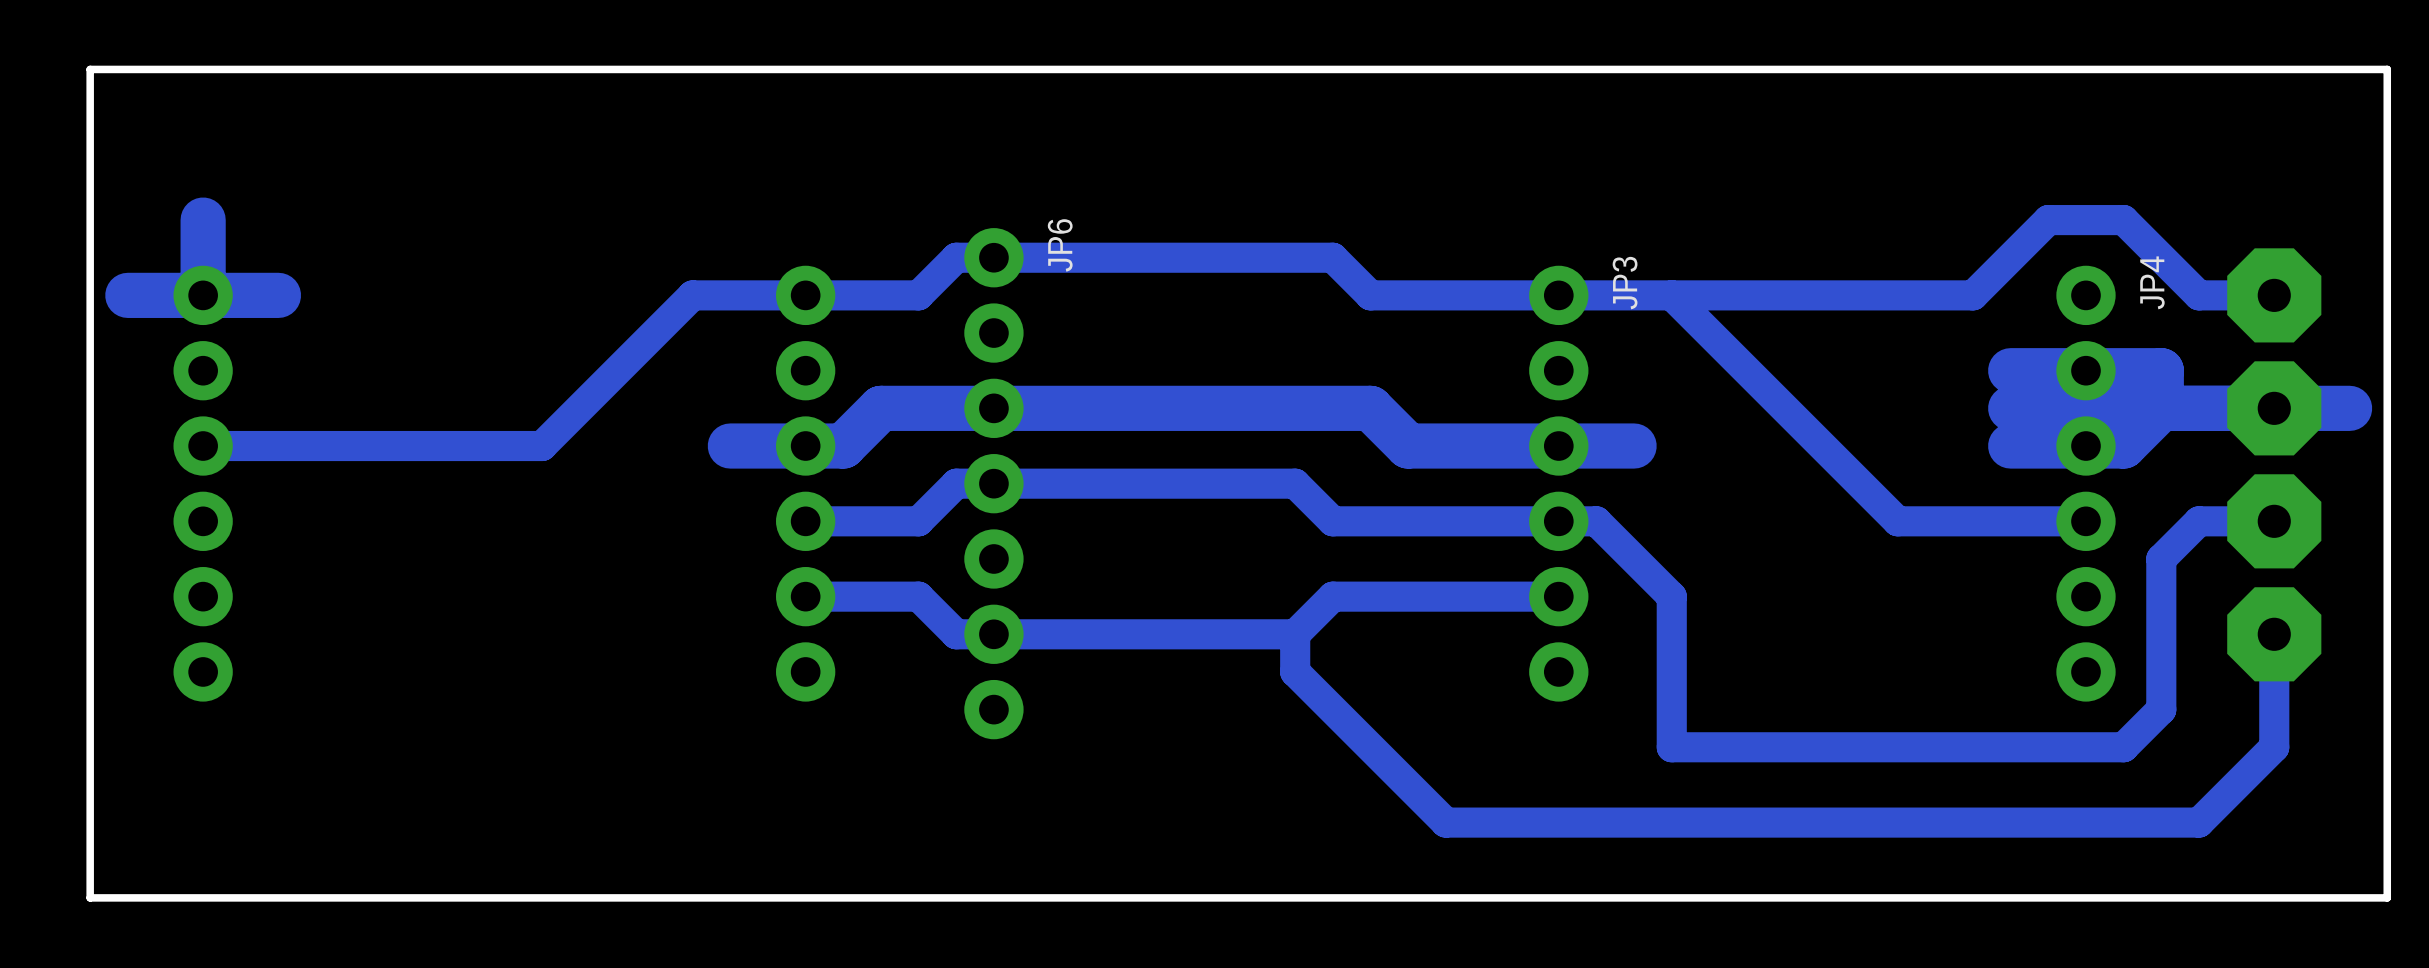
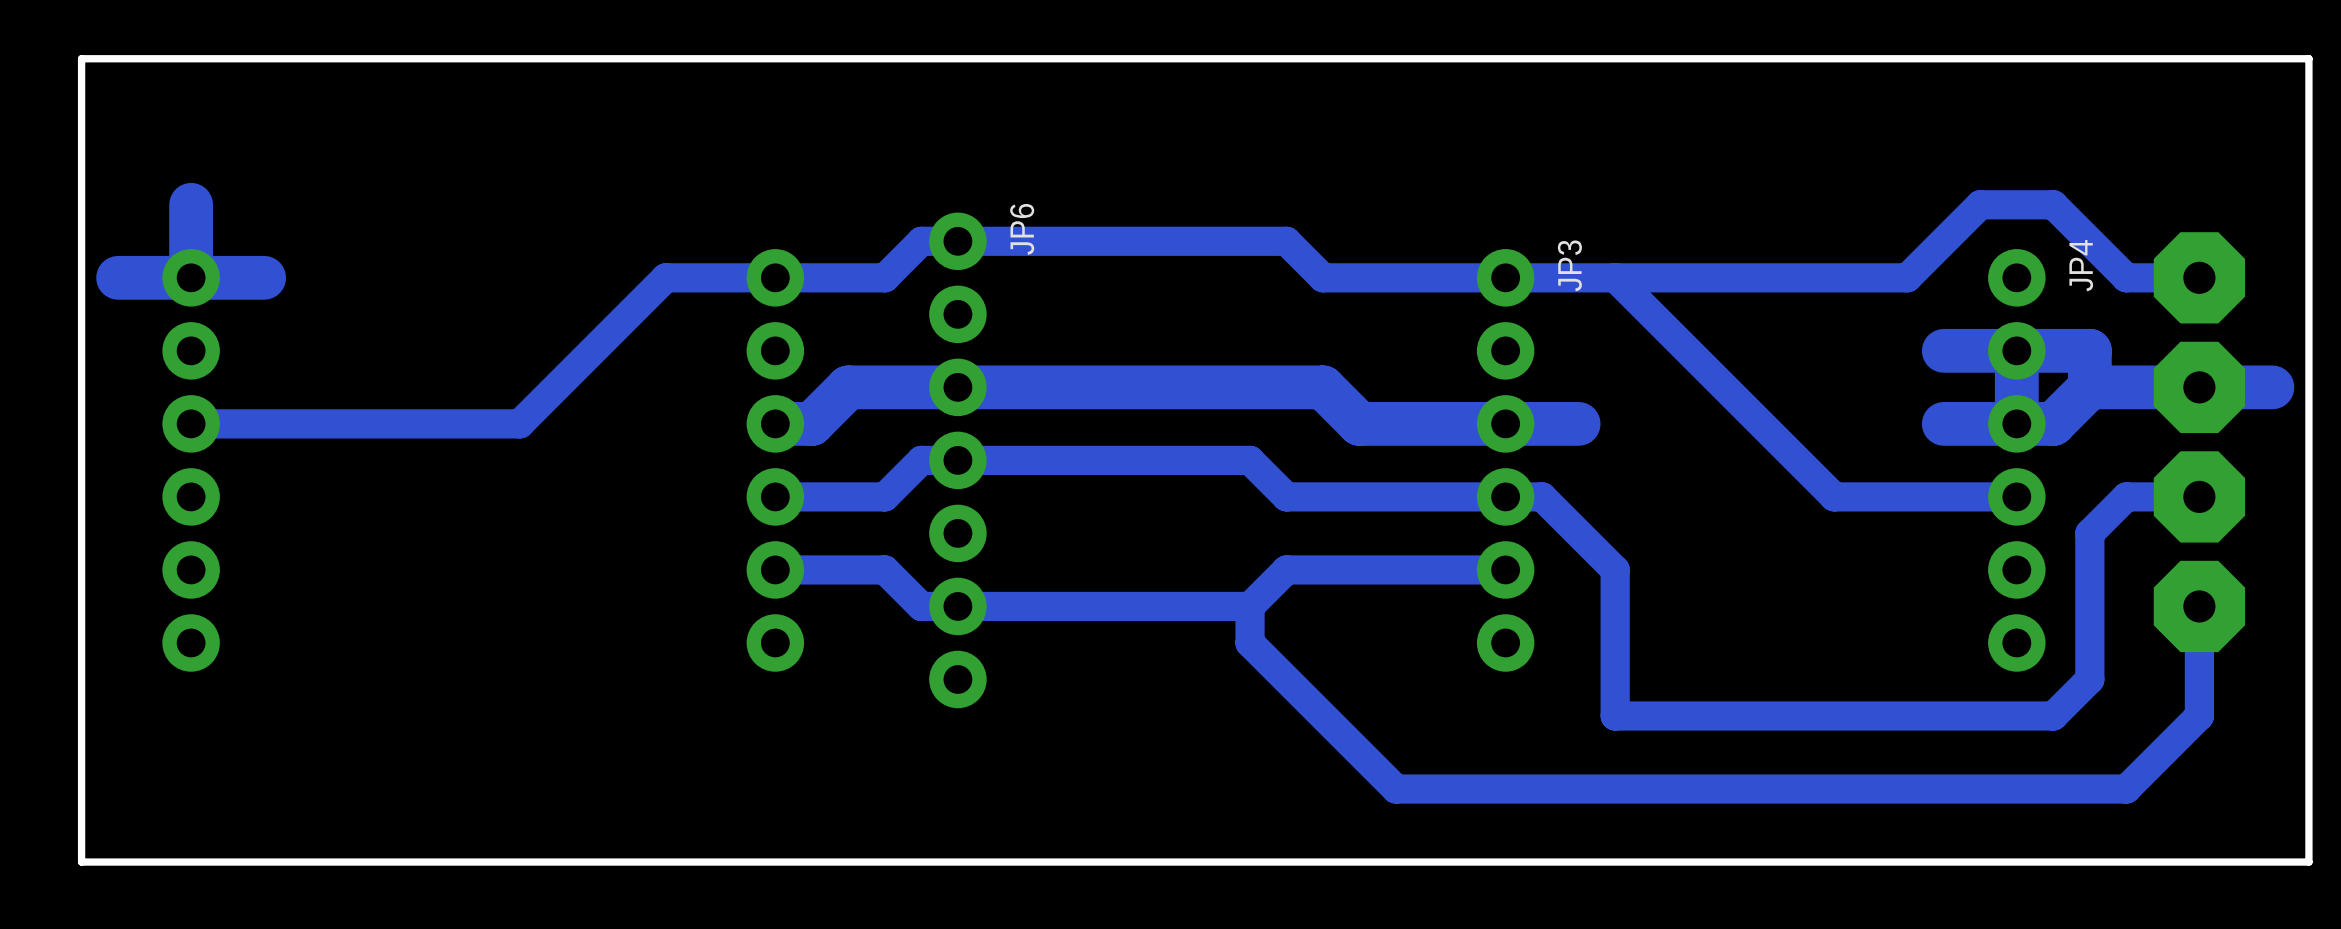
track: (2161, 408) (2010, 408) -> none
track: (805, 446) (730, 446) -> none

